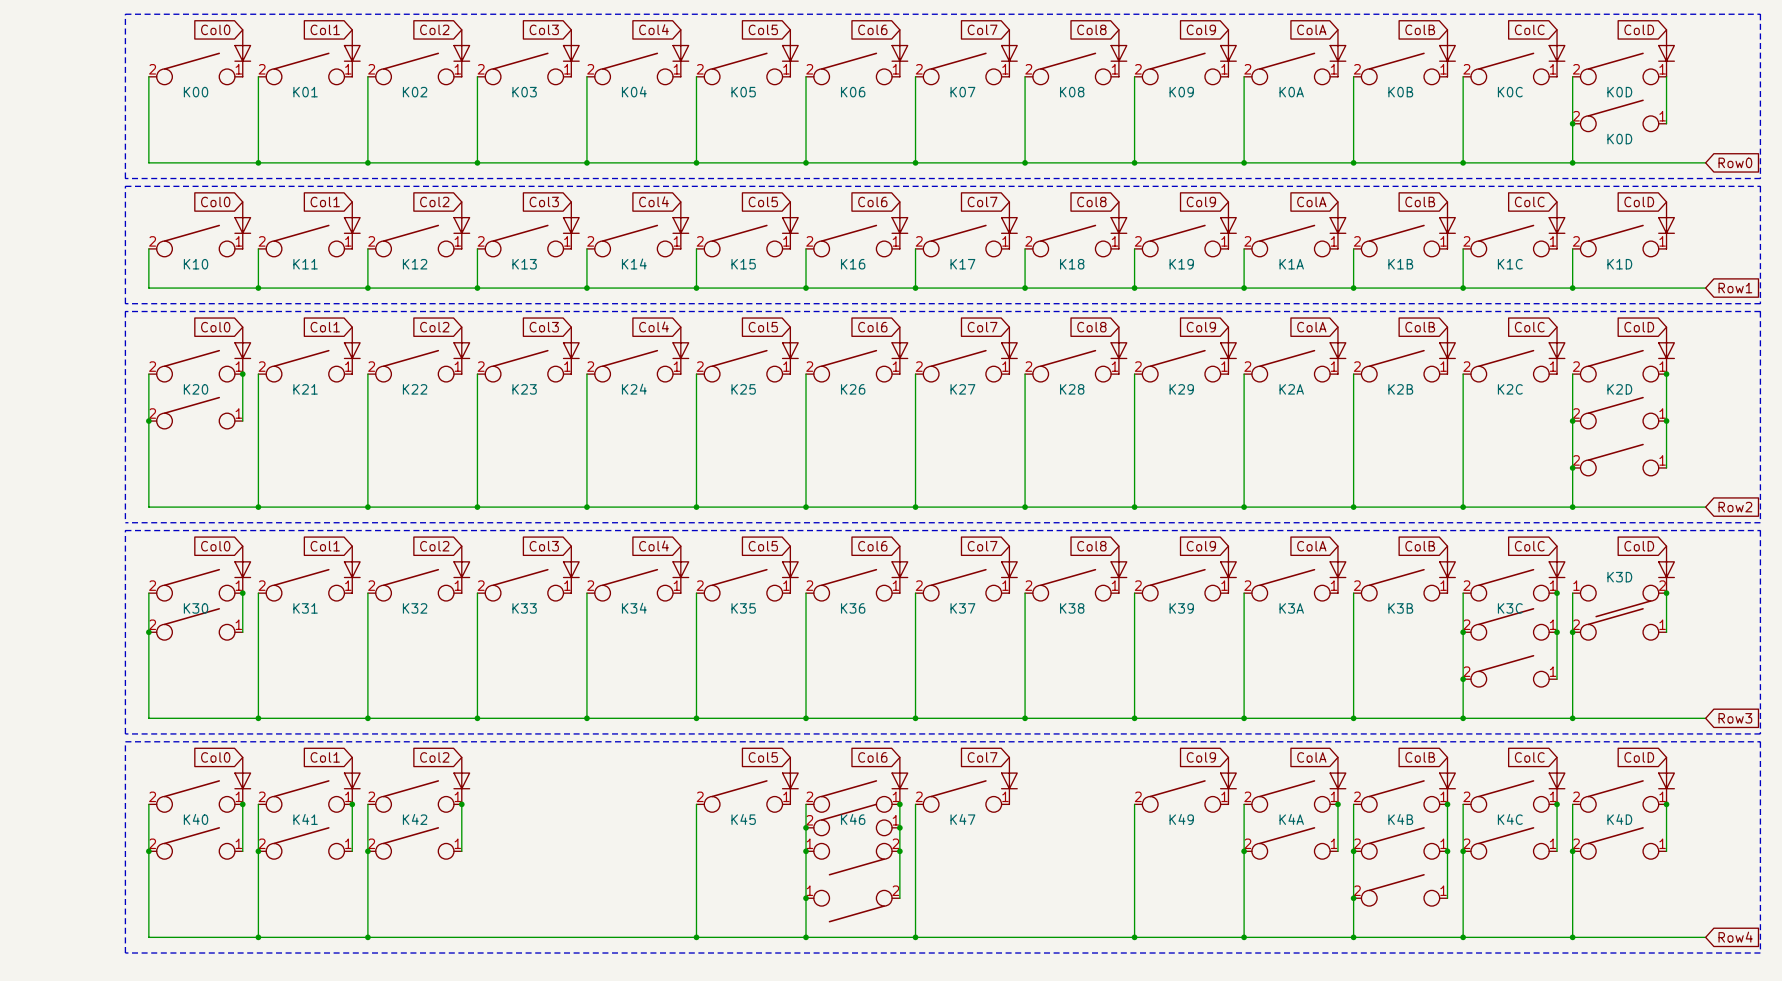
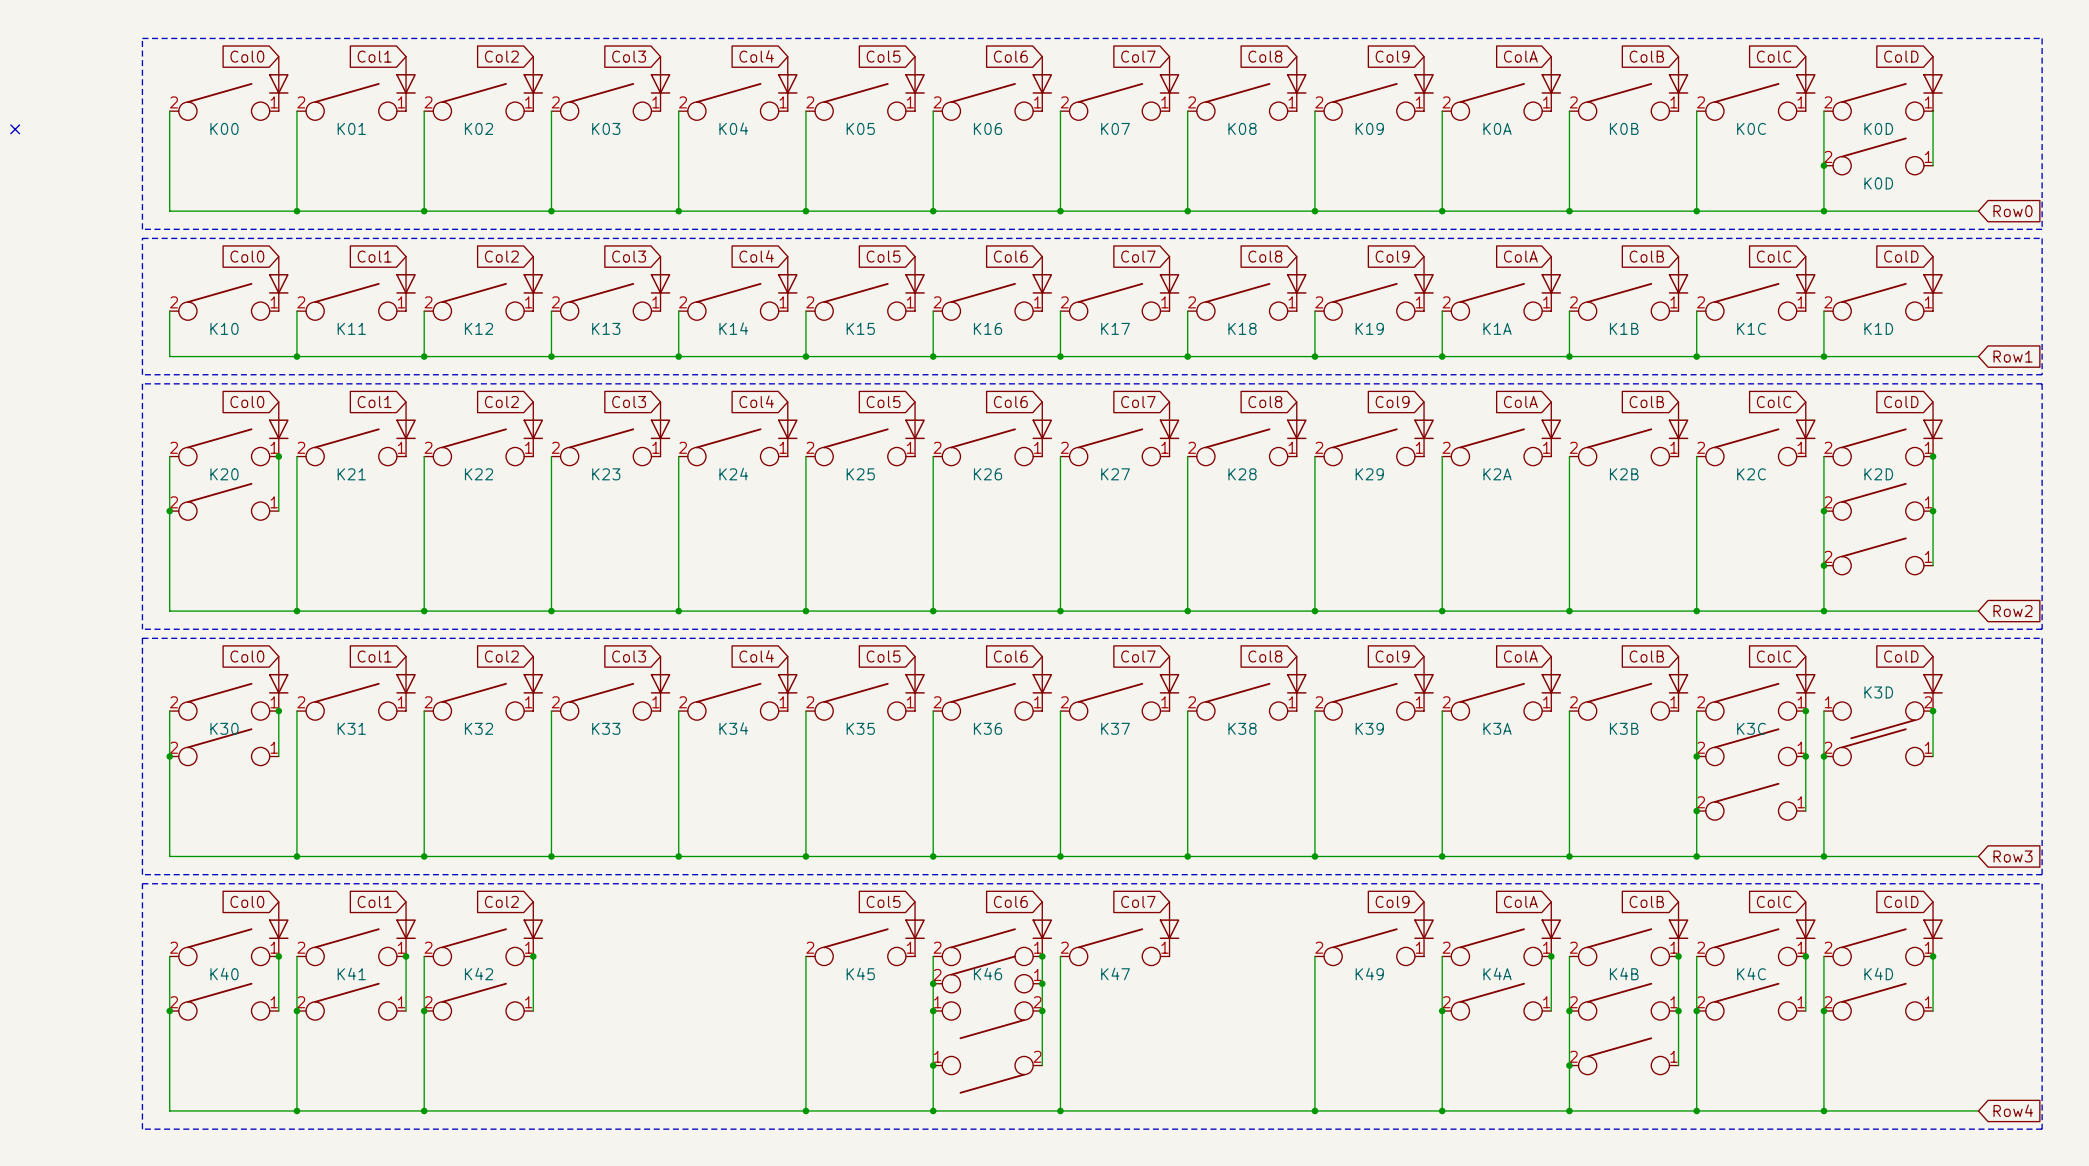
no-connect mark: none -> (15, 129)

